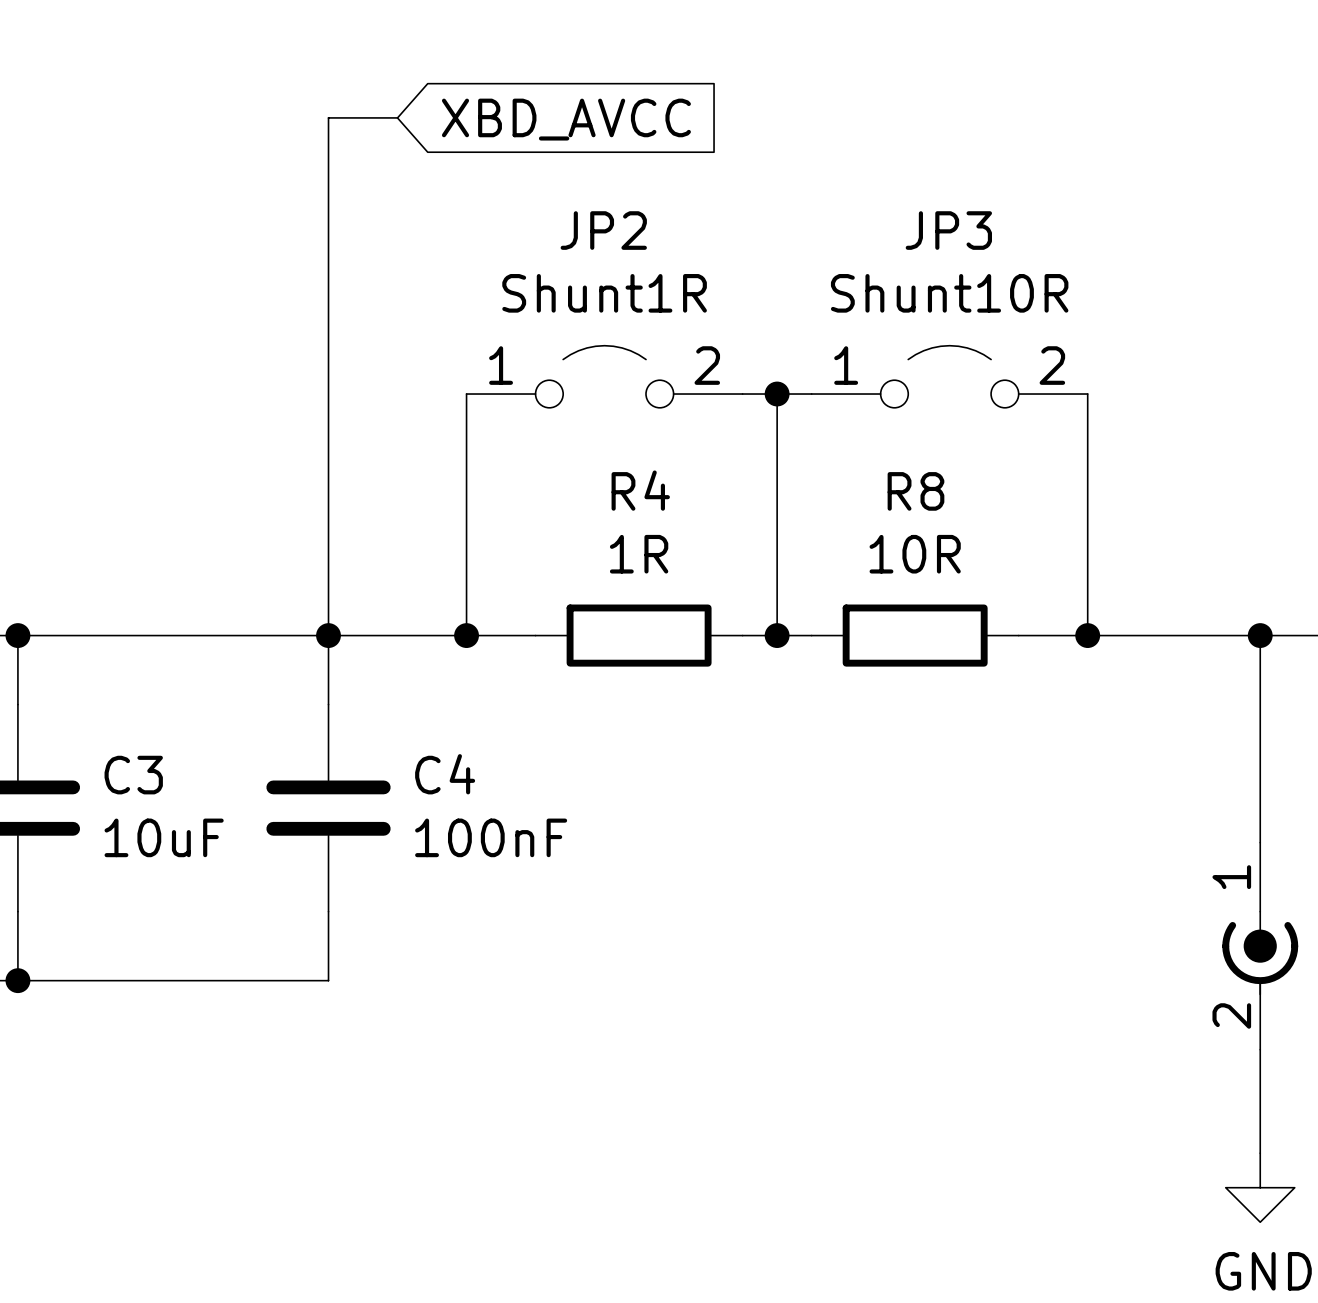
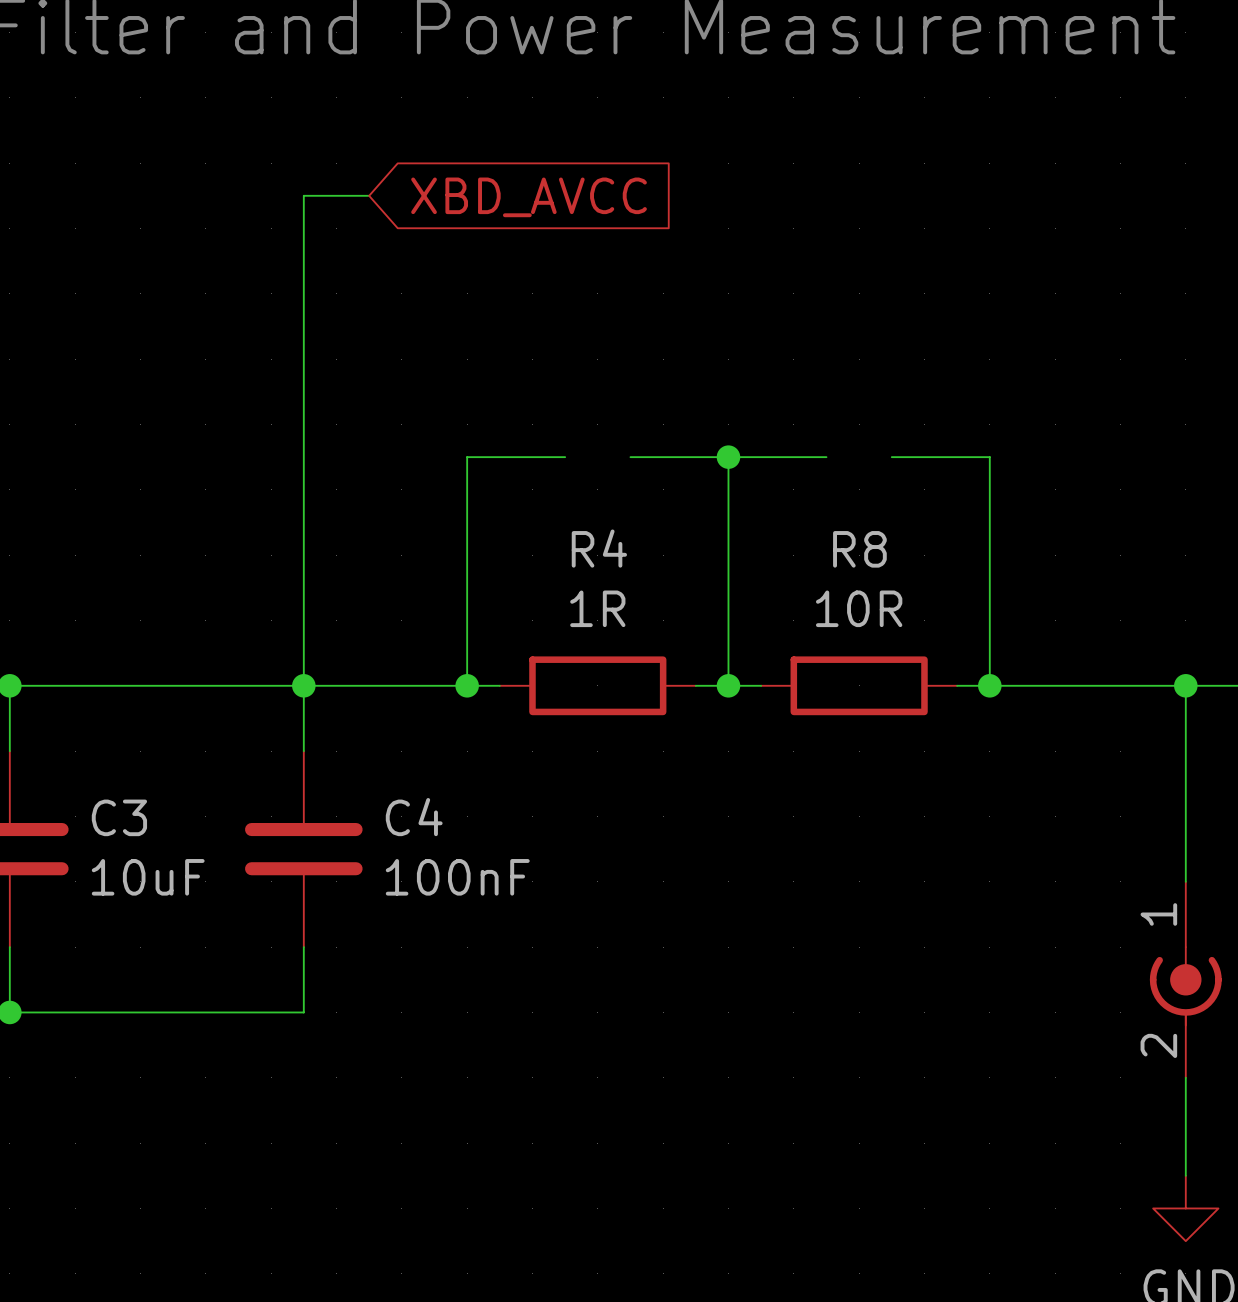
JP2: Shunt1R (604, 376) -> none
JP3: Shunt10R (949, 376) -> none
wire: (466, 394) (466, 635) -> none
wire: none -> (565, 457) (467, 457) (467, 685)
wire: none -> (891, 457) (989, 457) (989, 685)
wire: (1087, 394) (1087, 635) -> none
junction position: (466, 635) -> (467, 685)
junction position: (1087, 635) -> (989, 685)

